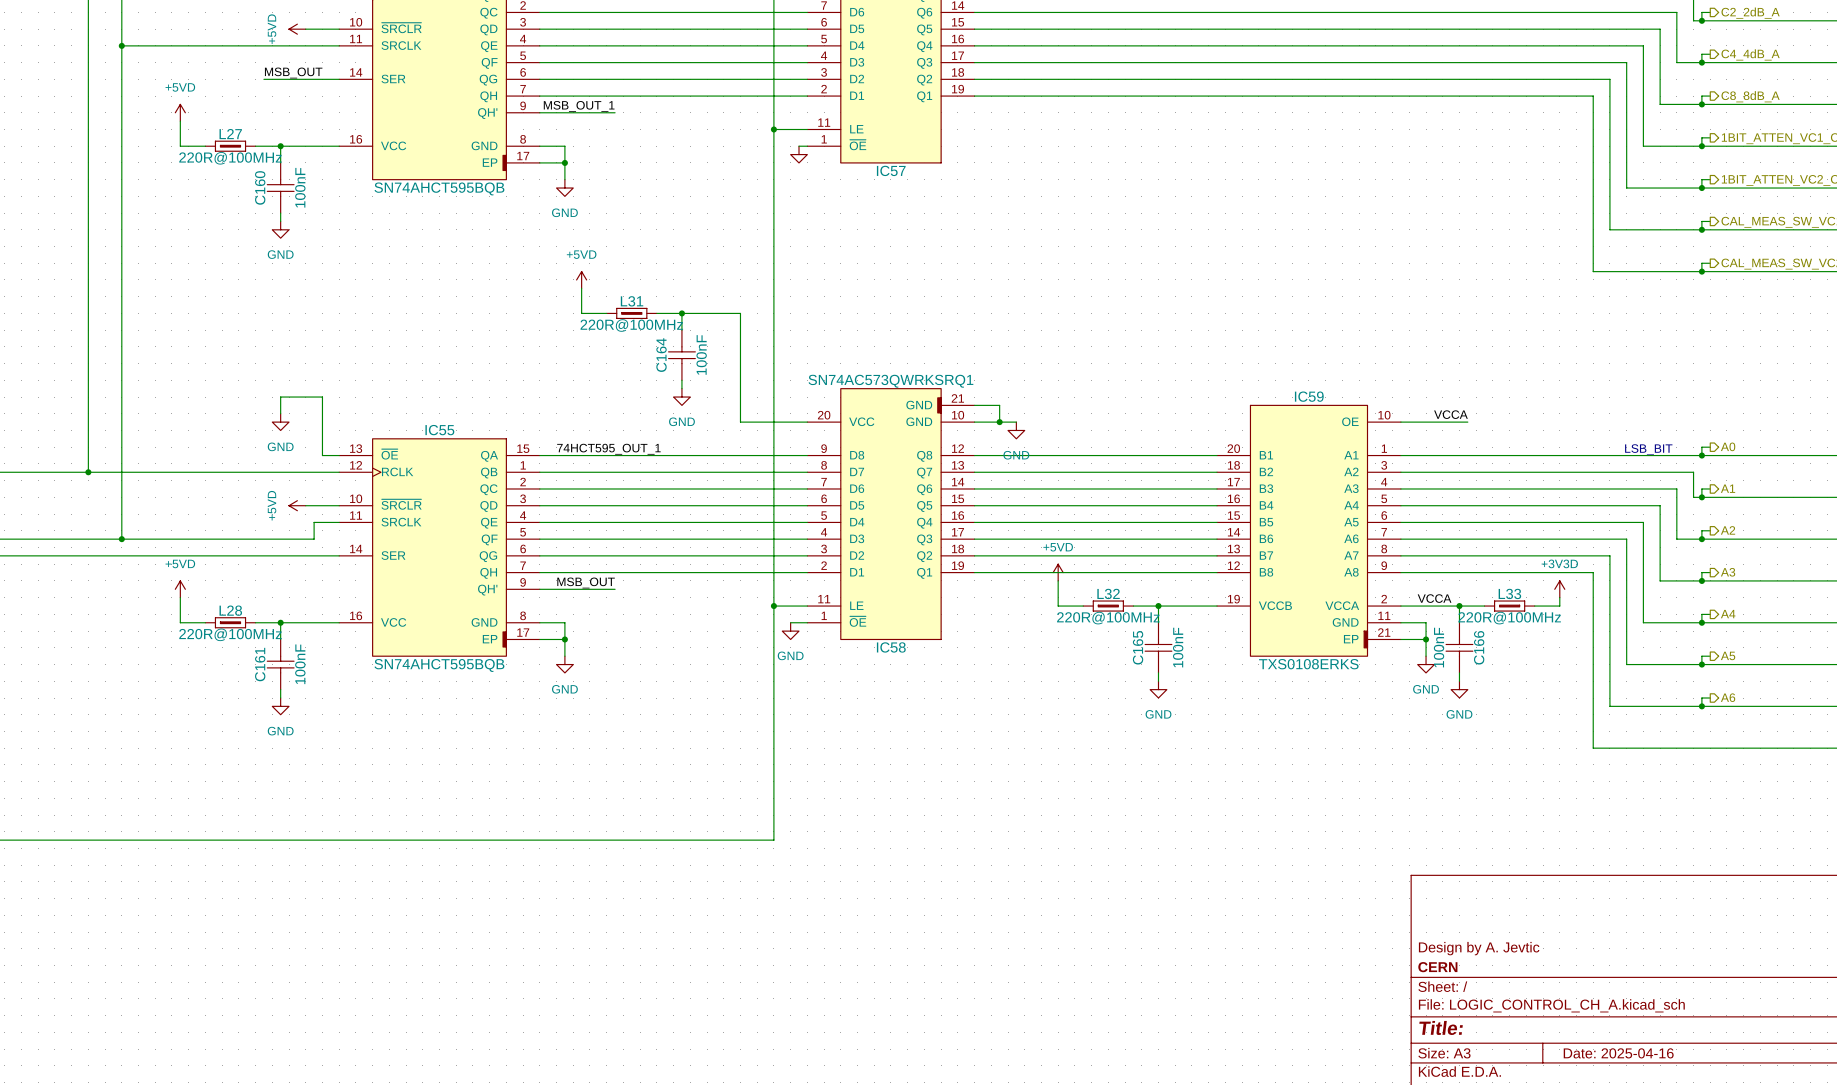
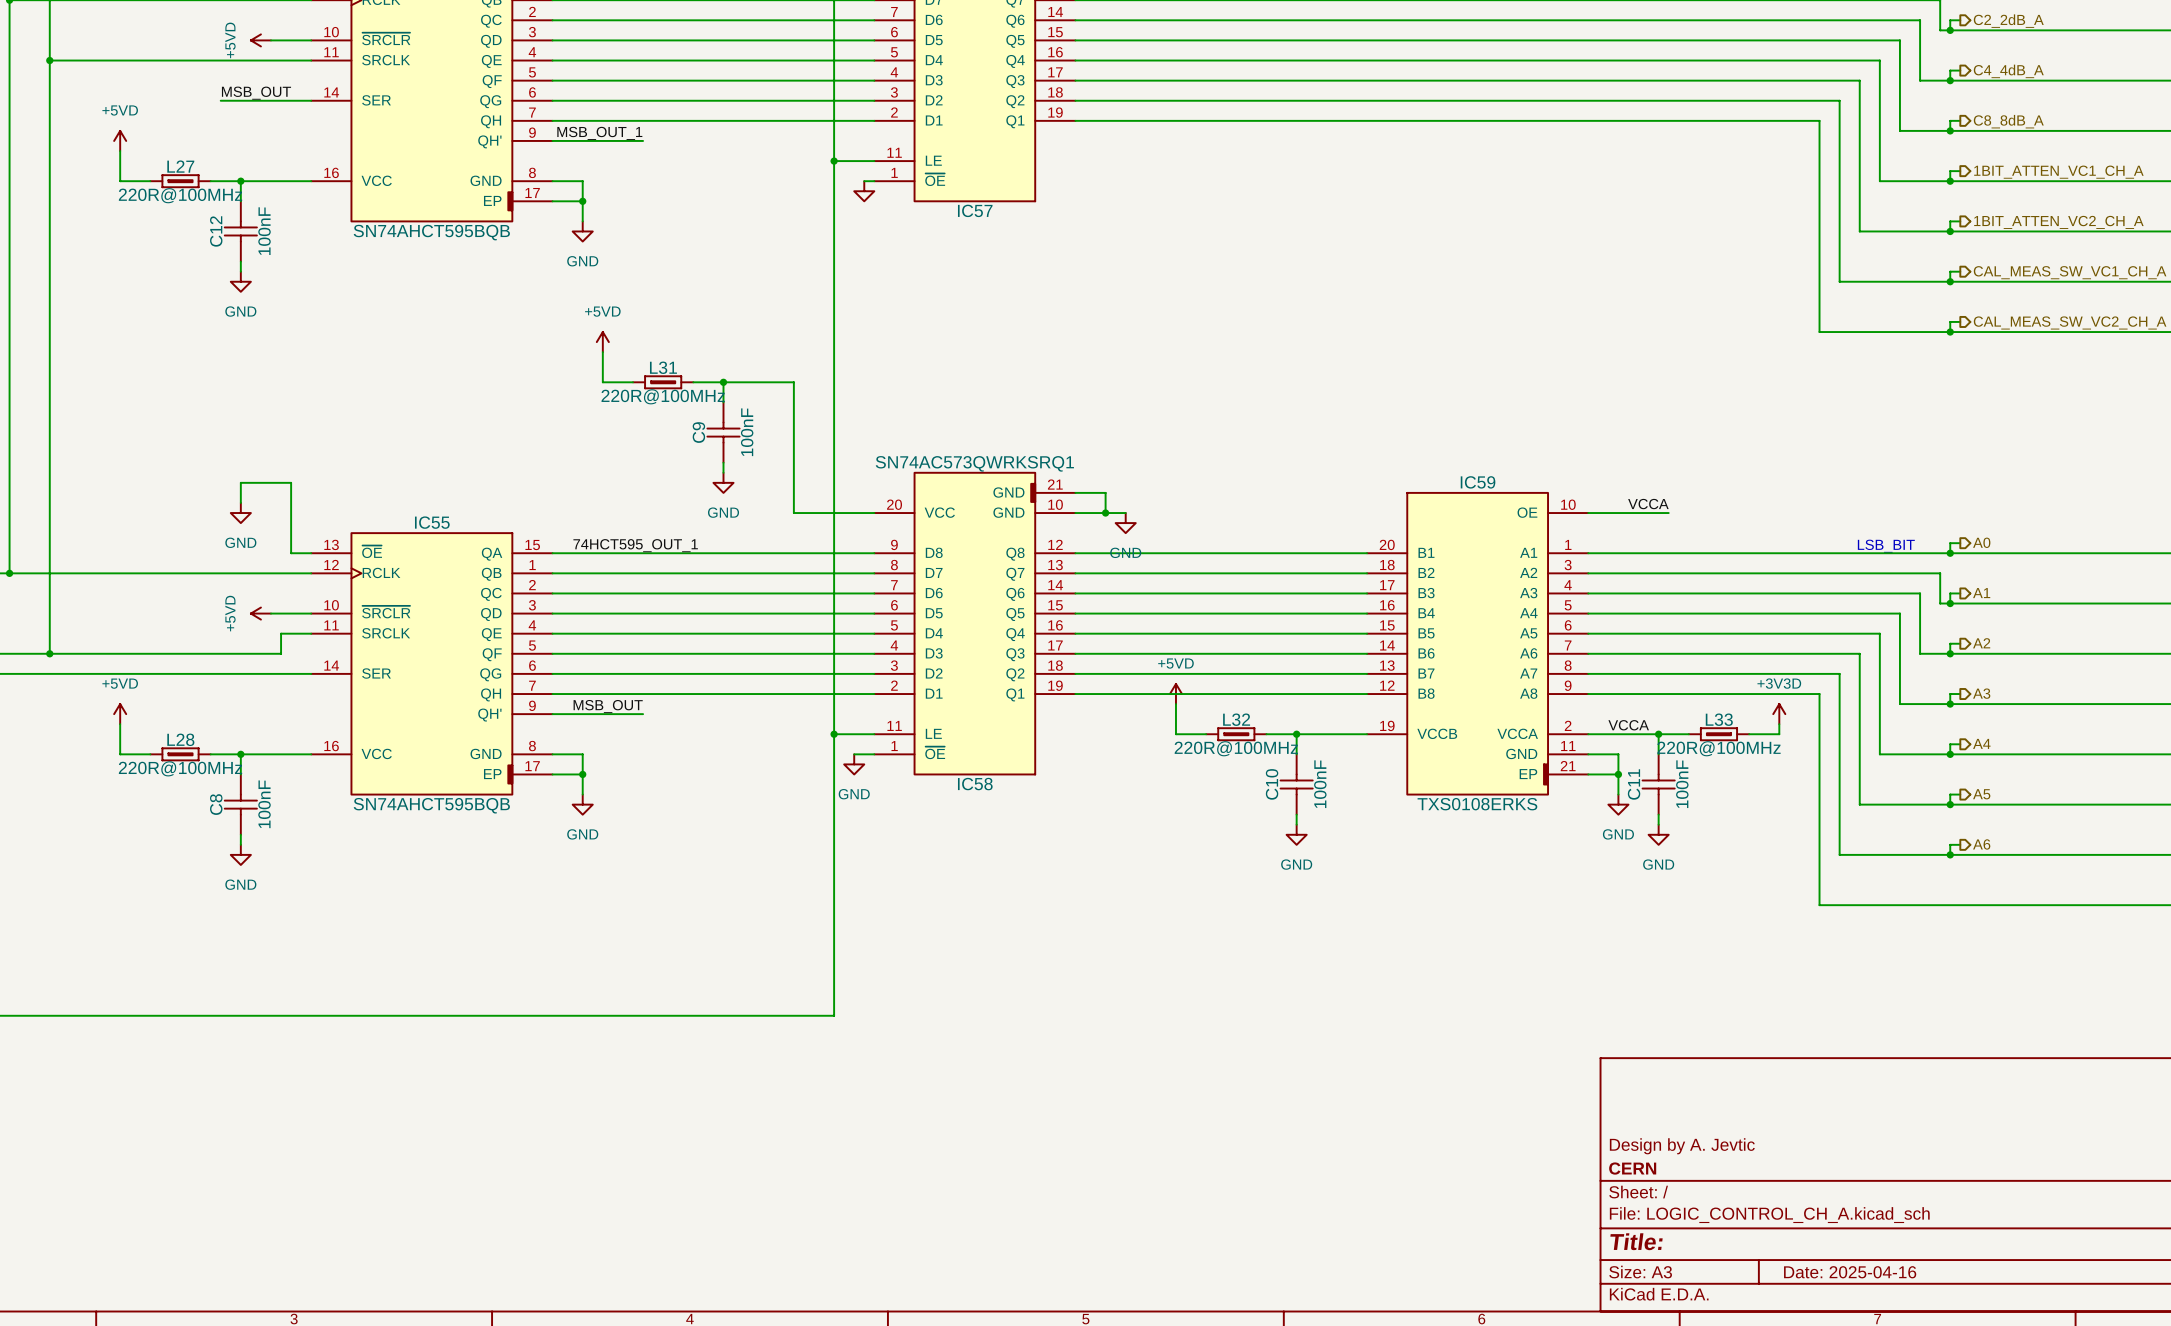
C160 name: C160 (260, 187) -> C12 (216, 231)
C164 name: C164 (661, 355) -> C9 (698, 432)
C165 name: C165 (1138, 647) -> C10 (1272, 784)
C166 value position: 100nF (1439, 647) -> 100nF (1682, 784)
C166 name: C166 (1479, 647) -> C11 (1634, 784)
C161 name: C161 (260, 664) -> C8 (216, 804)

